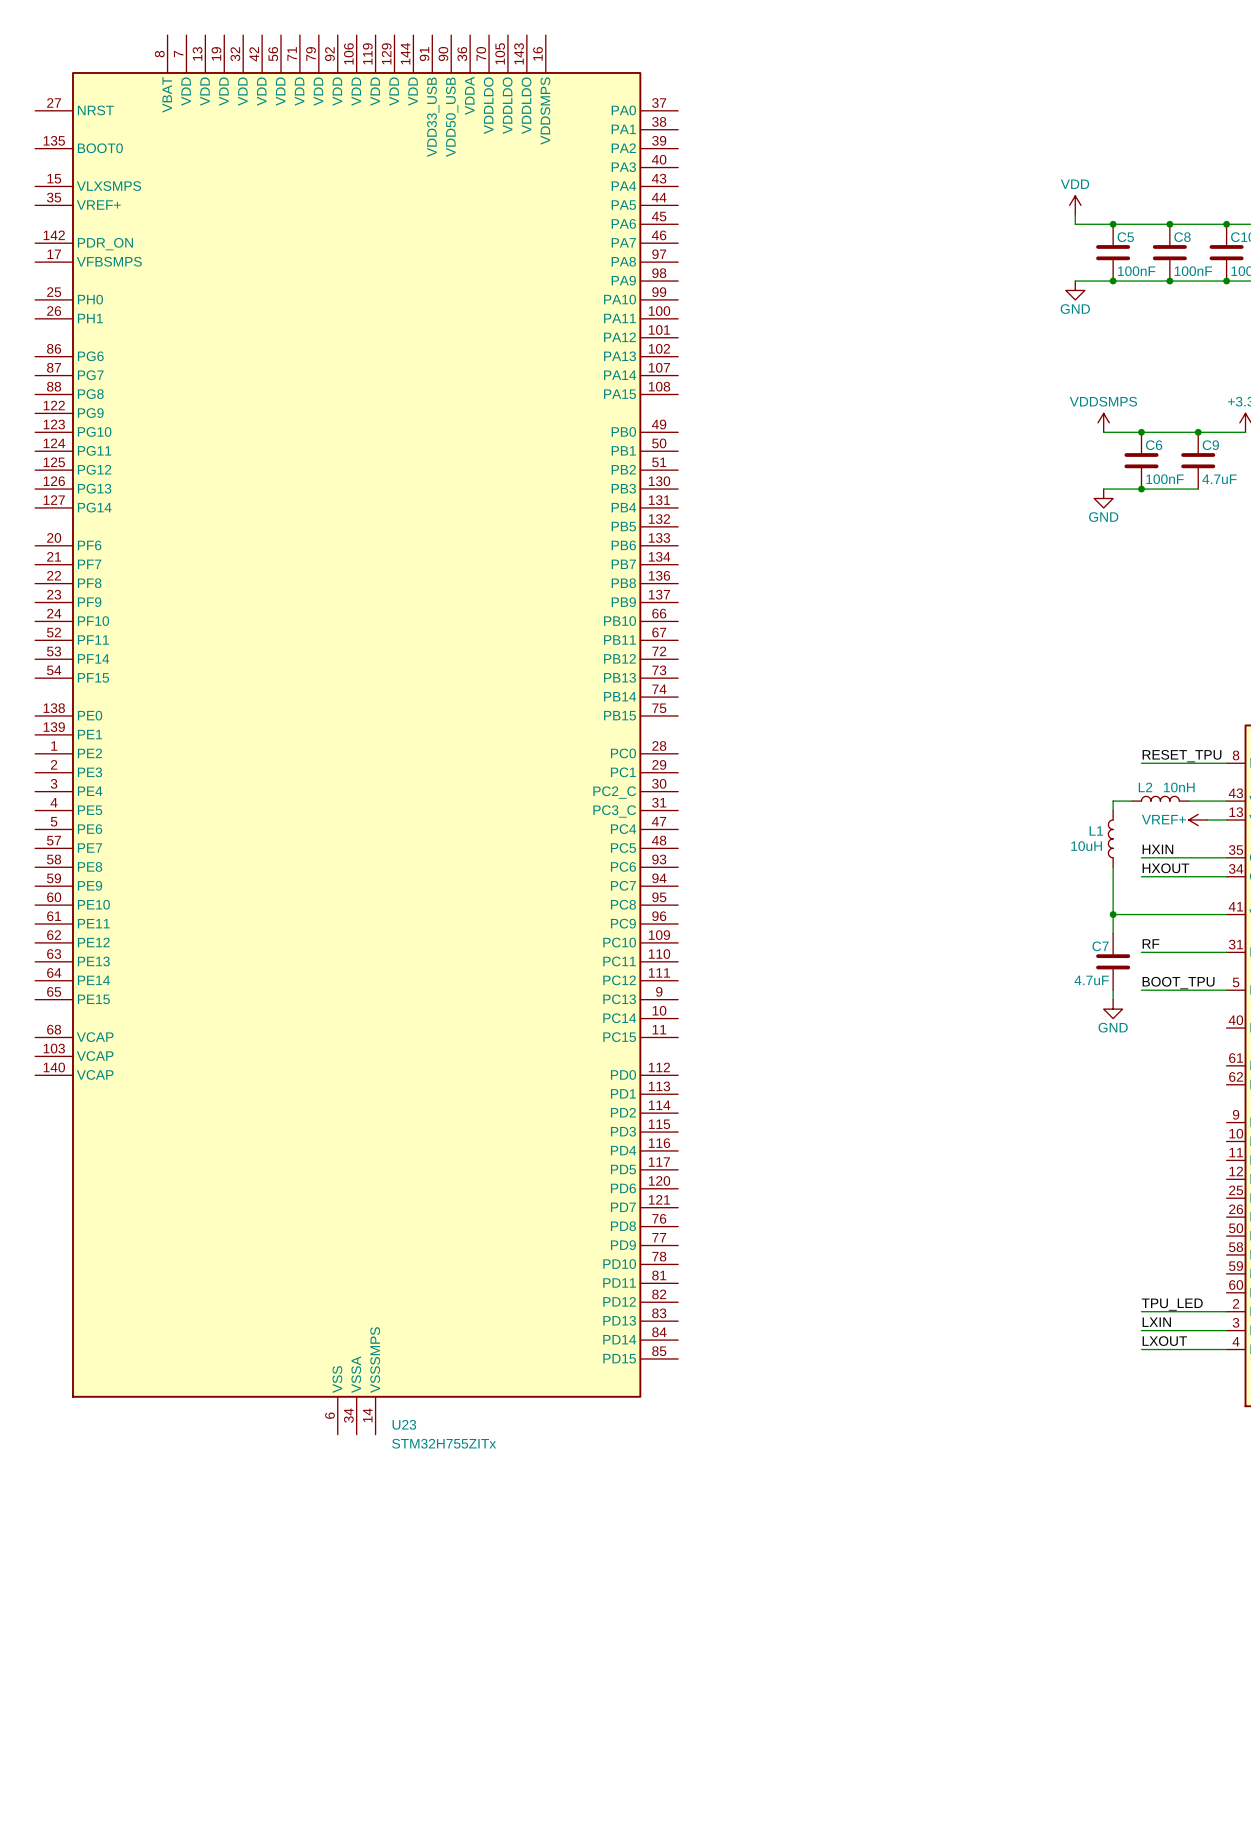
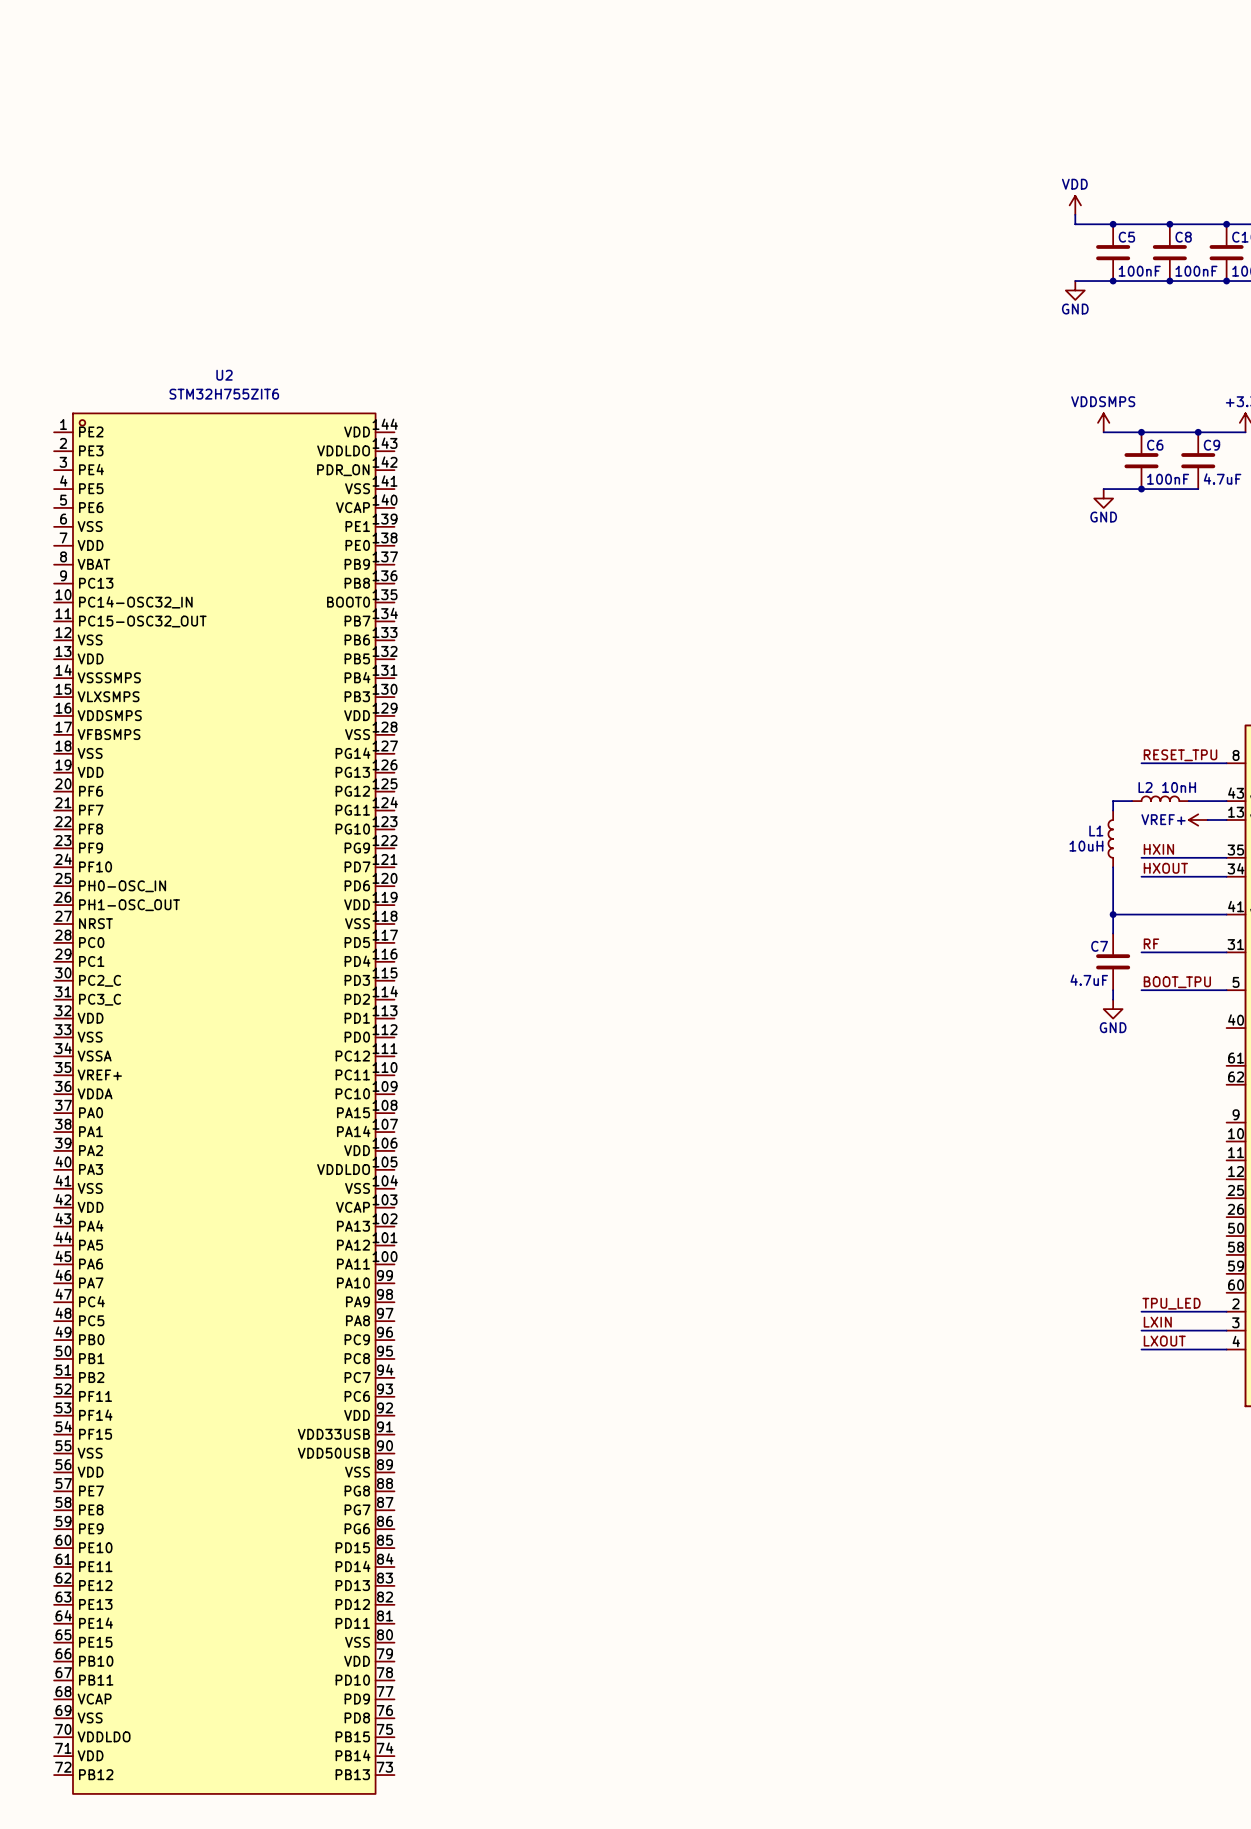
U23: STM32H755ZITx (356, 734) -> none
U2: none -> STM32H755ZIT6 (224, 1103)

